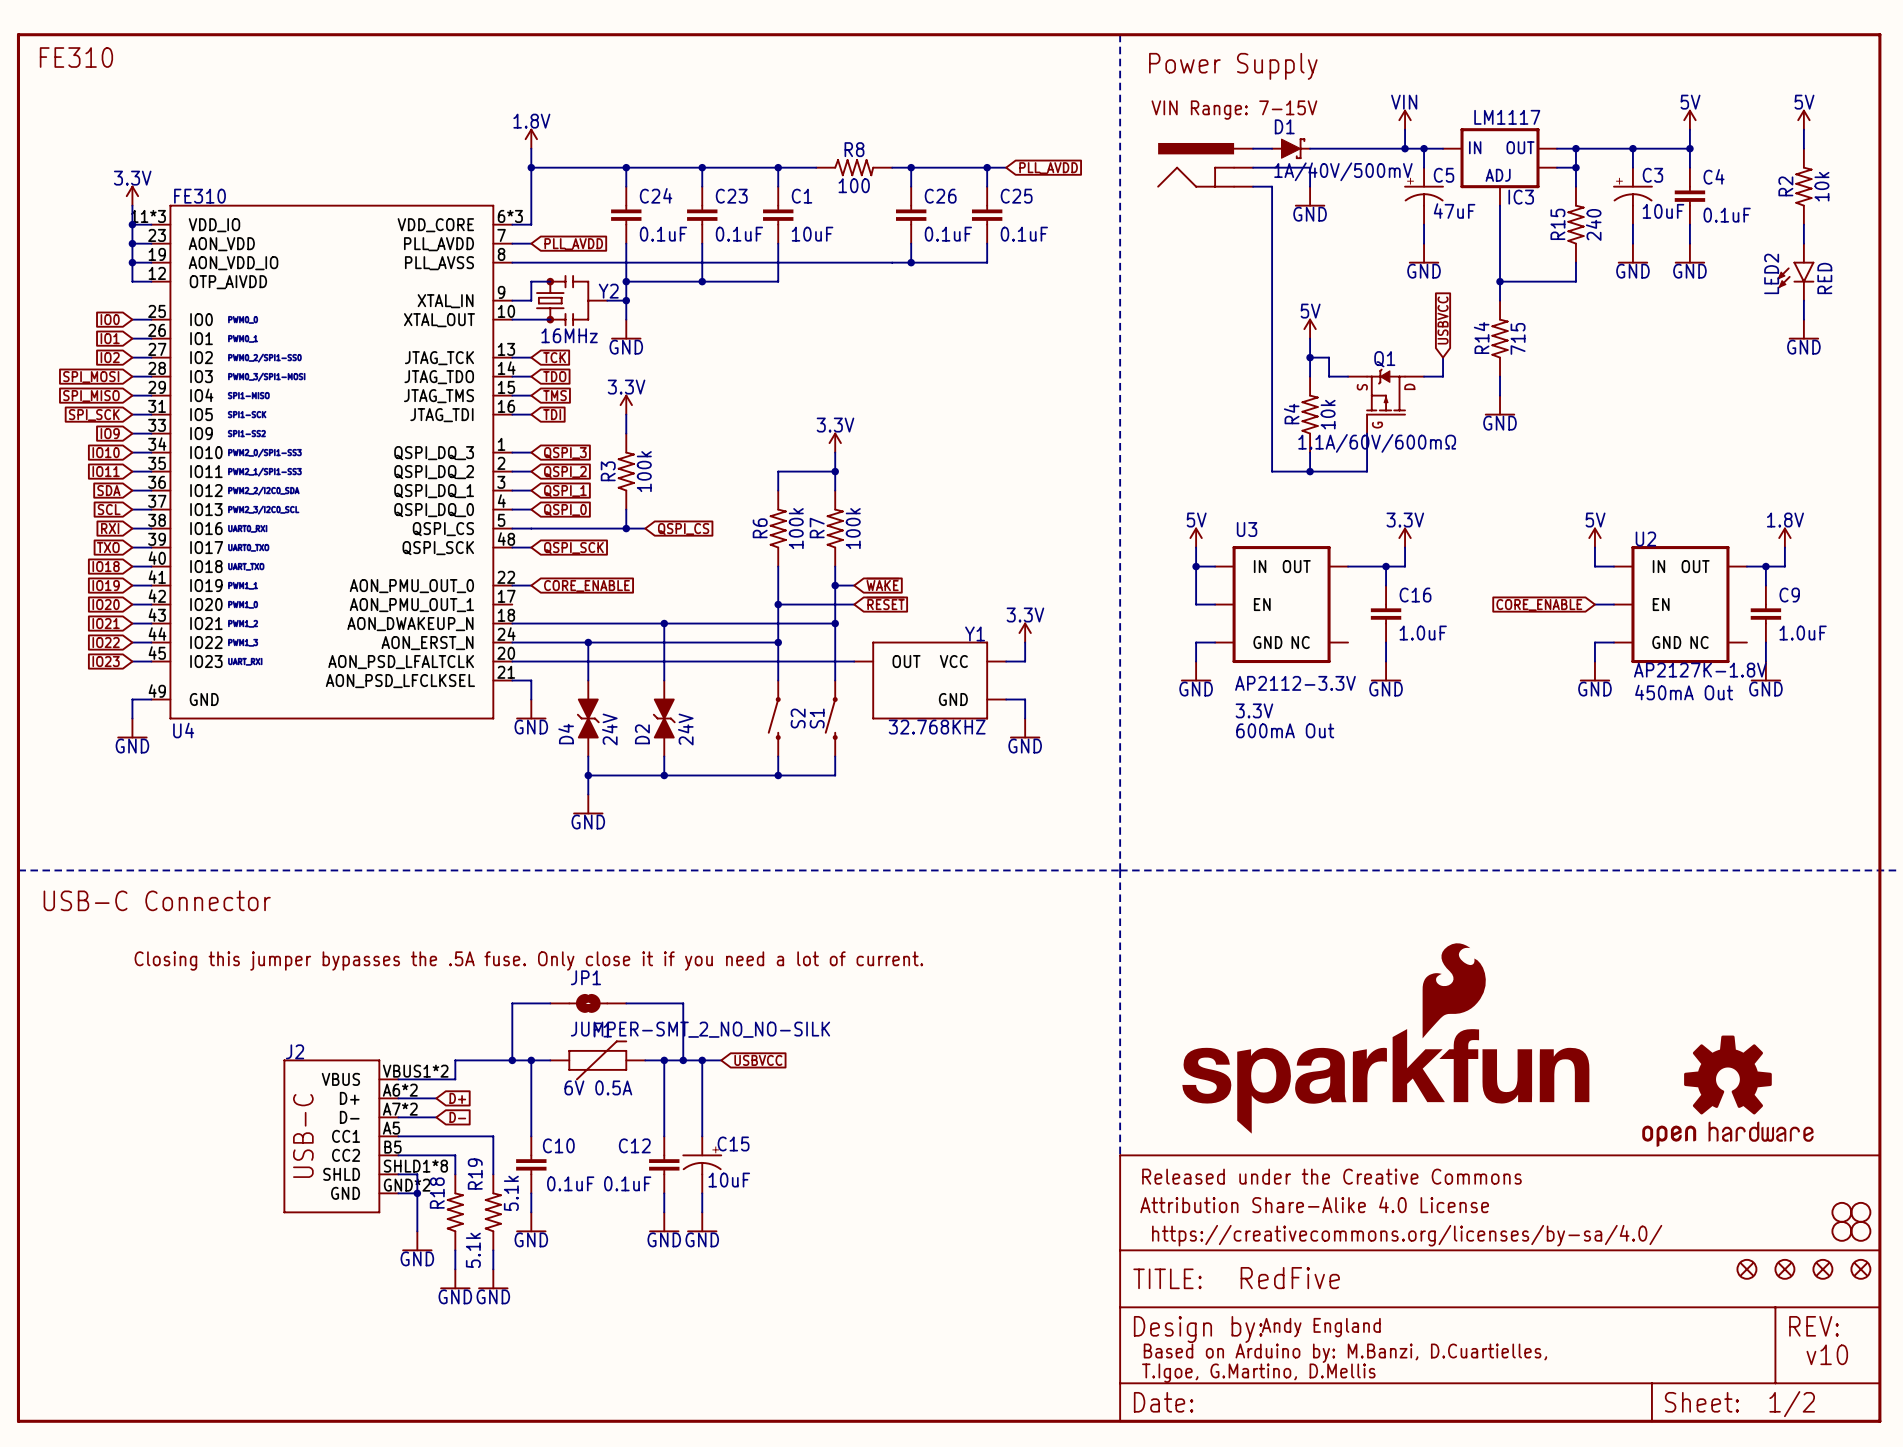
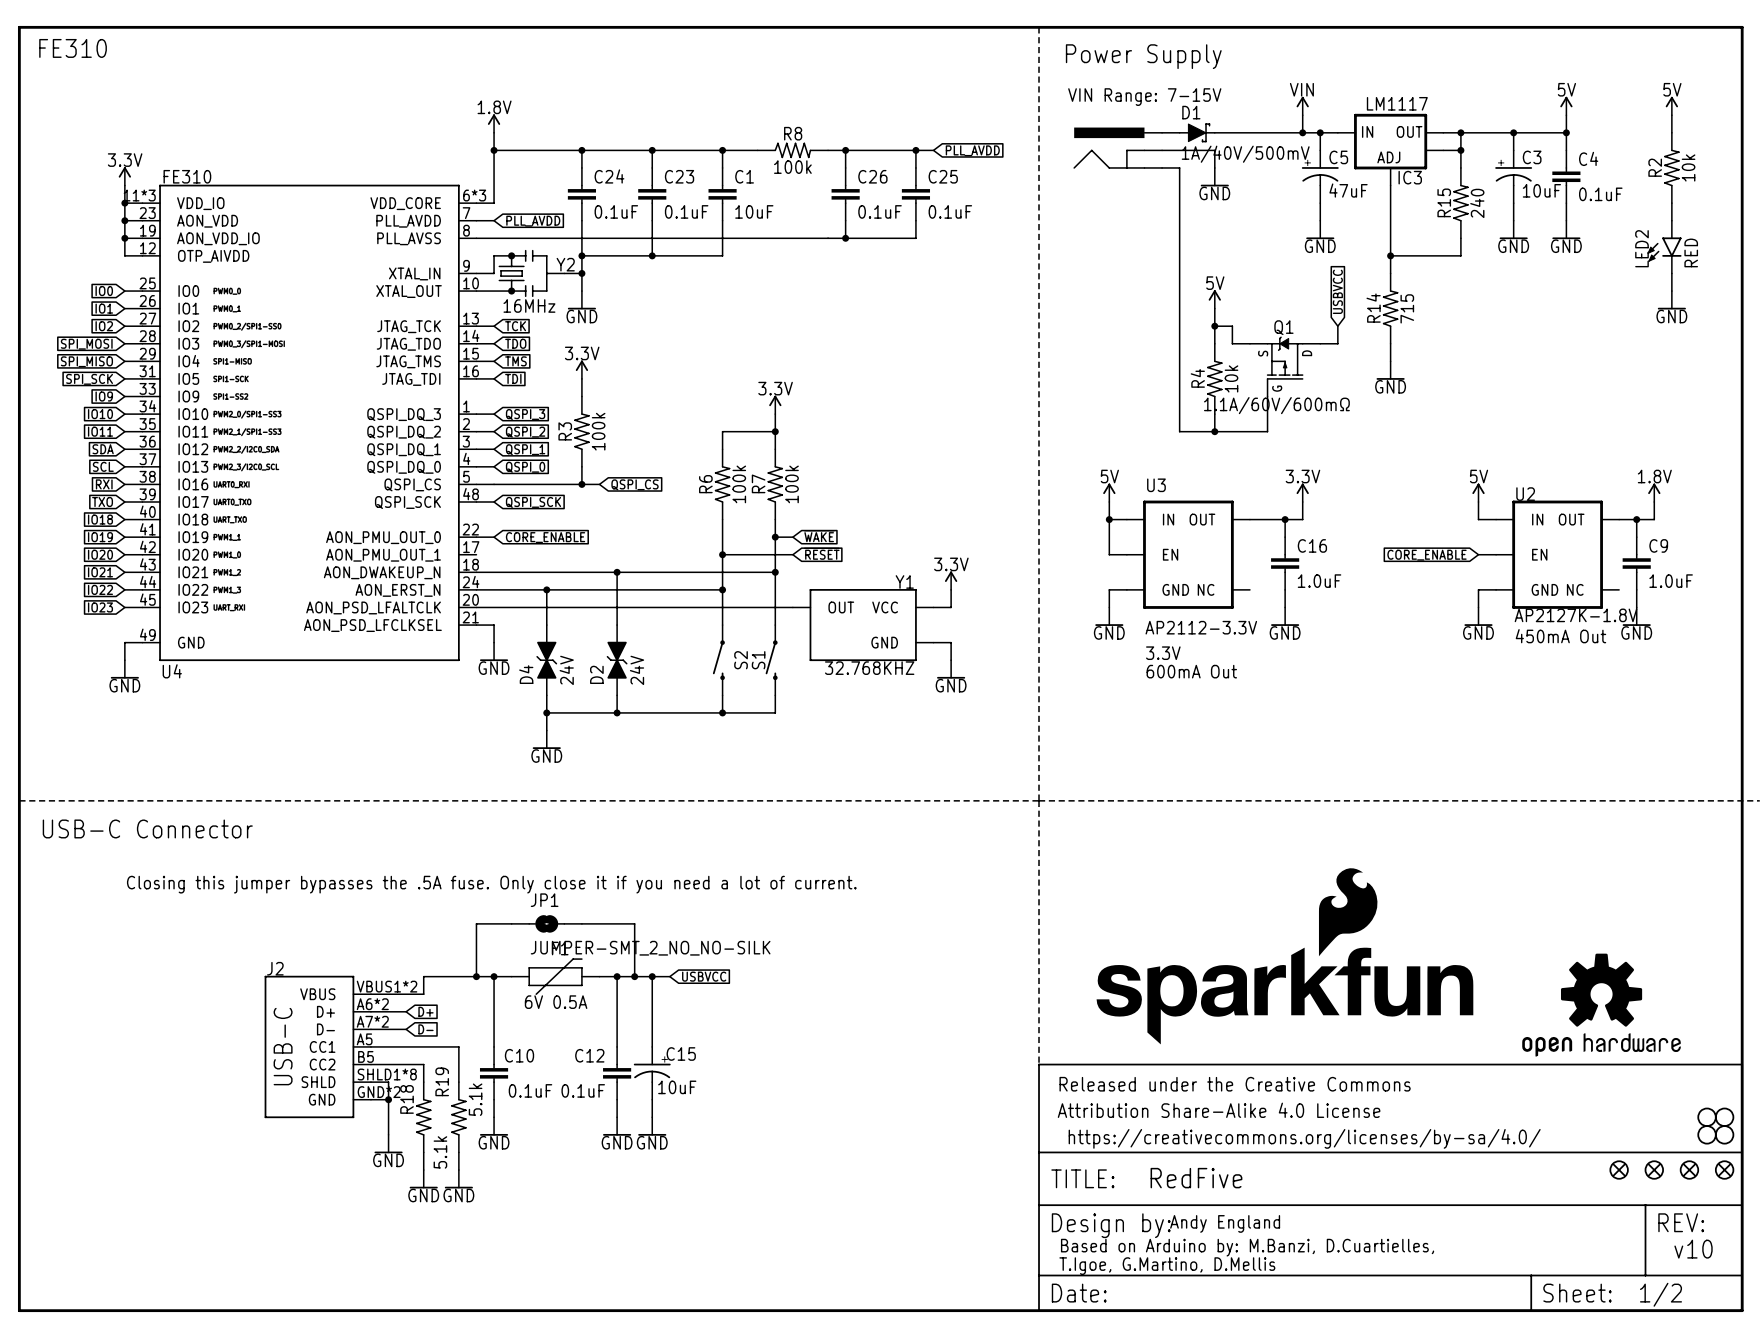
R8 value: 100 (854, 185) -> 100k (792, 167)

